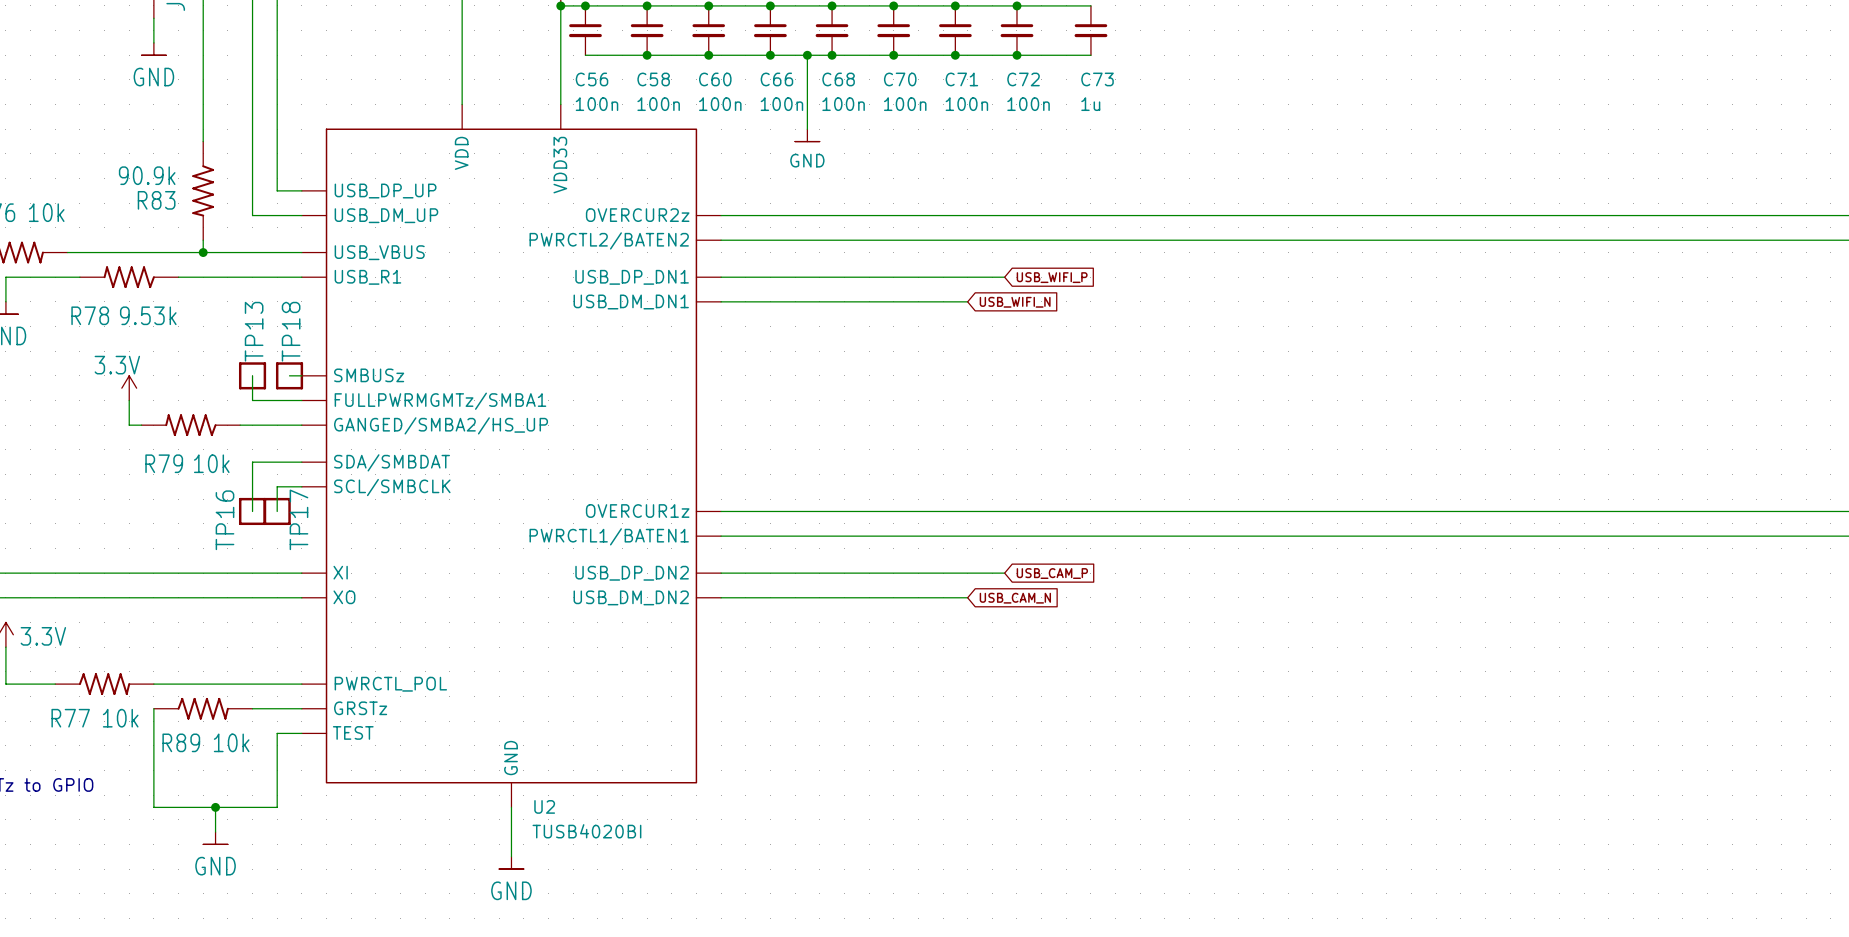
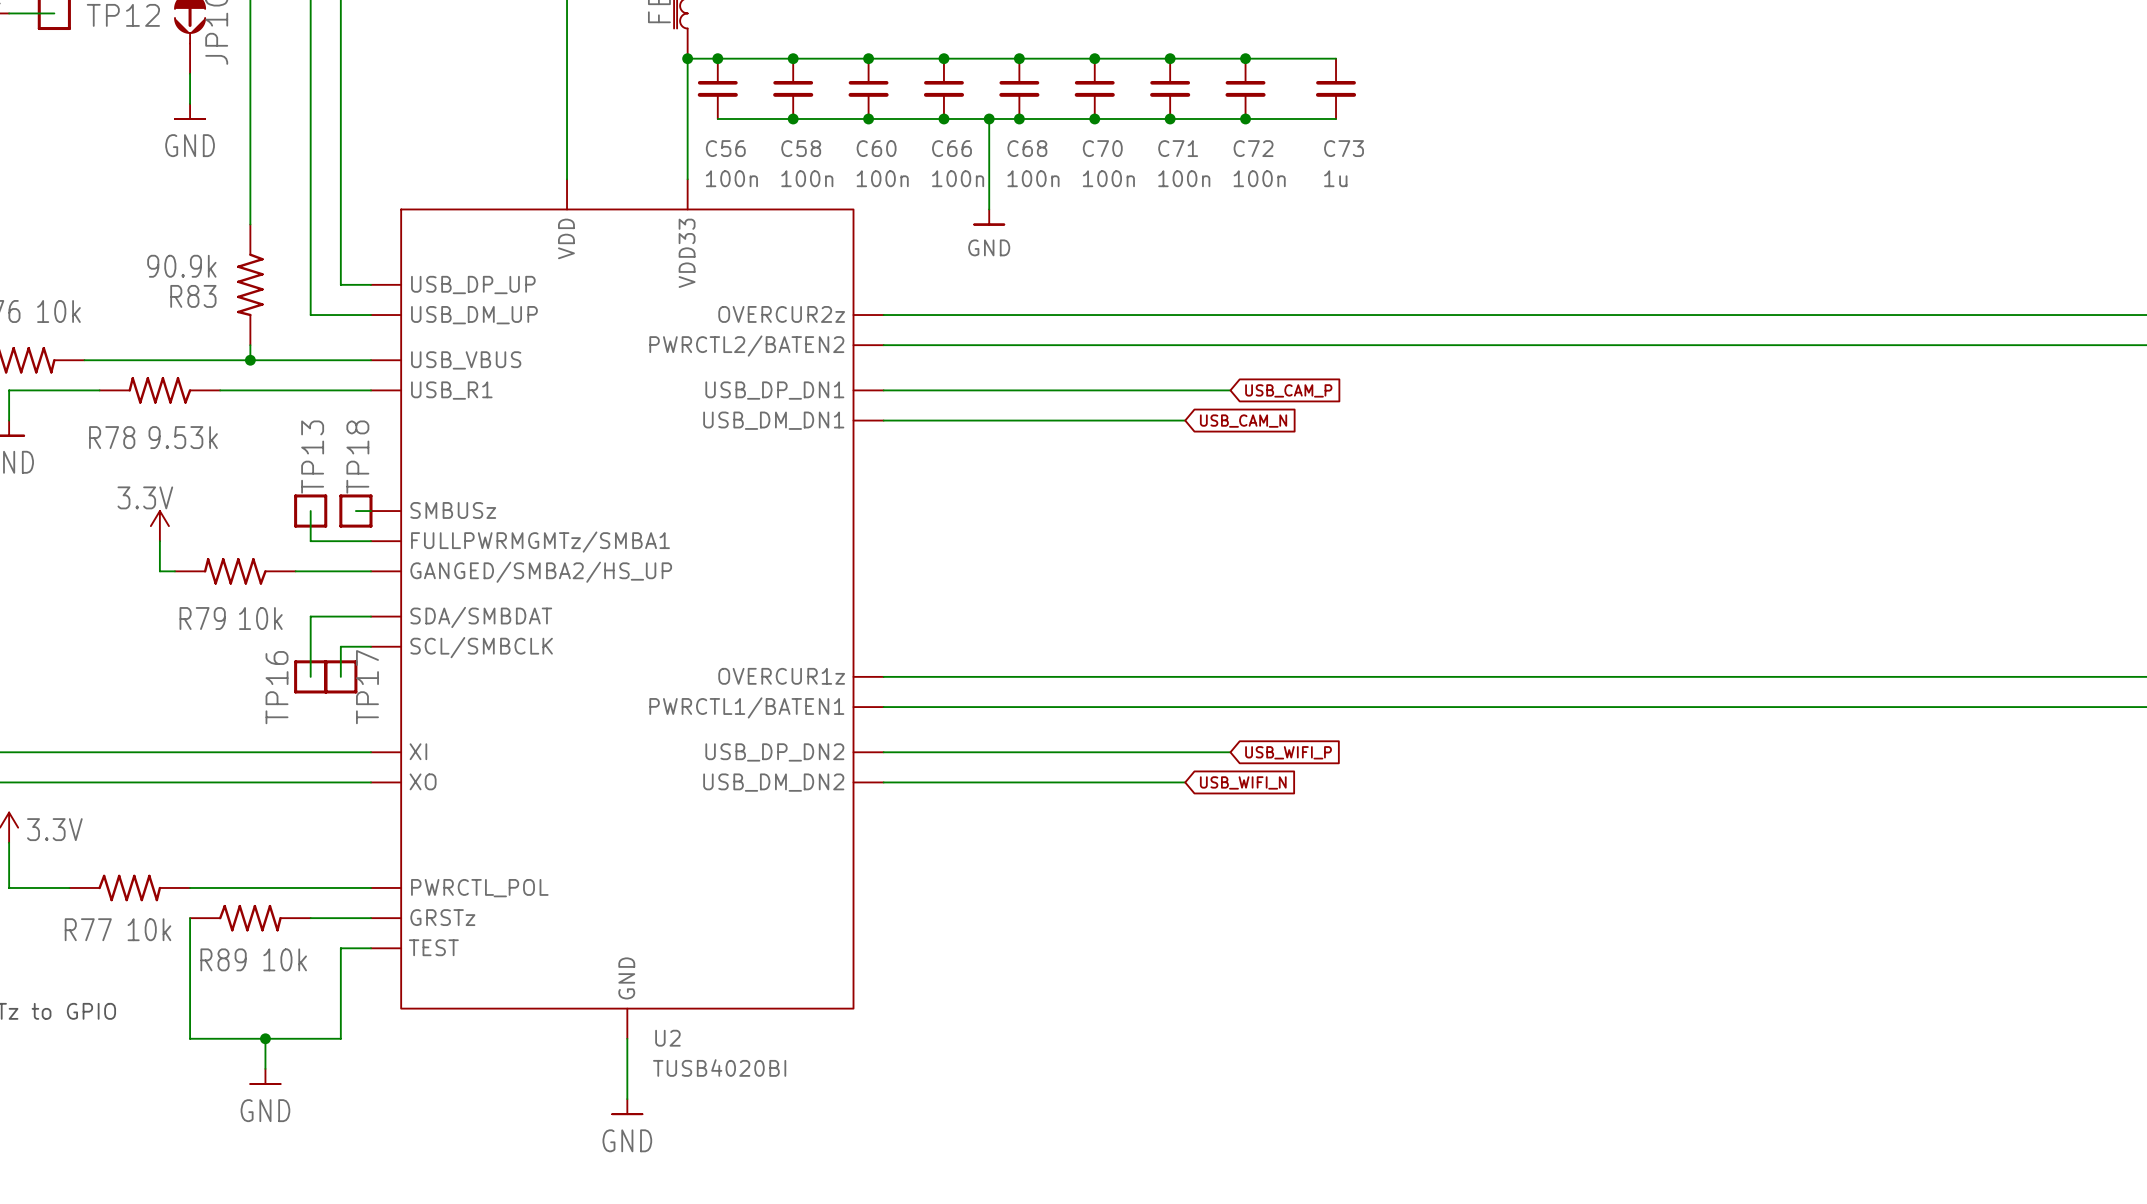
global label: USB_WIFI_P (1052, 277) -> USB_CAM_P (1288, 390)
global label: USB_WIFI_N (1015, 302) -> USB_CAM_N (1243, 421)
global label: USB_CAM_P (1052, 573) -> USB_WIFI_P (1288, 752)
global label: USB_CAM_N (1015, 598) -> USB_WIFI_N (1243, 782)

